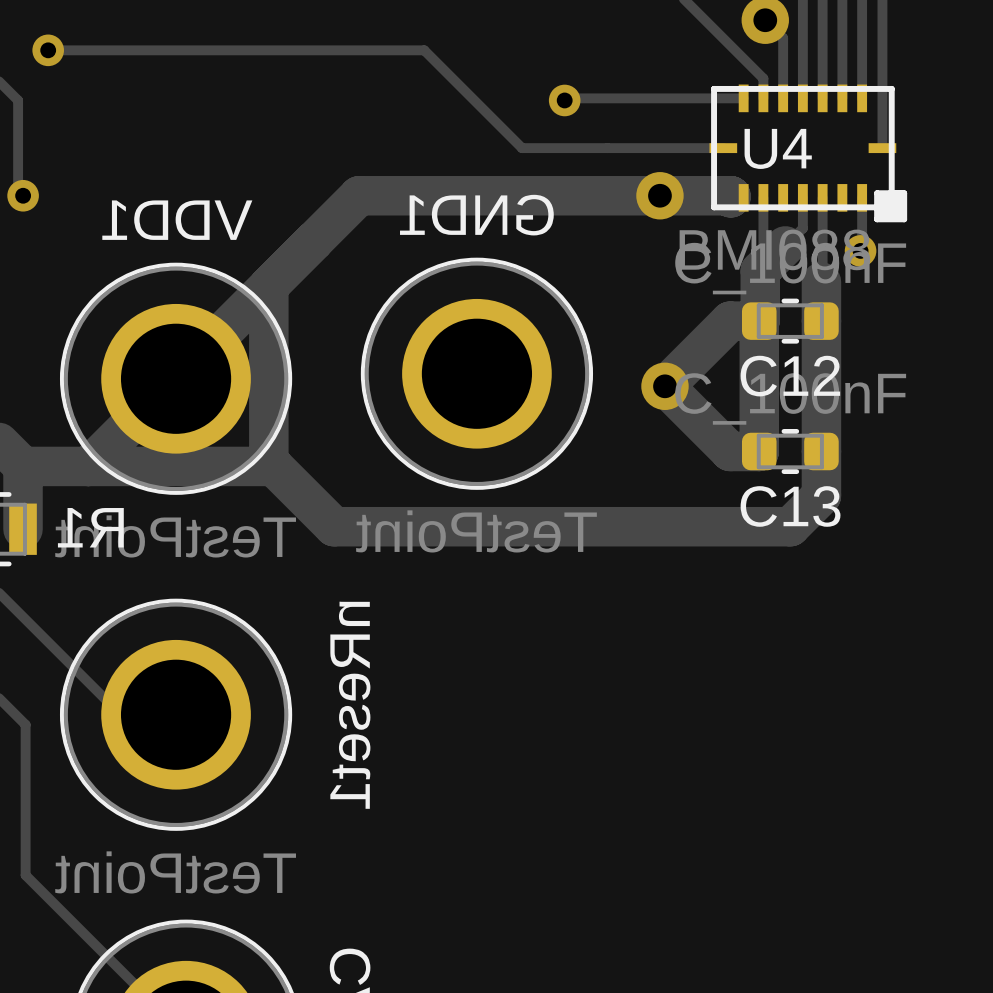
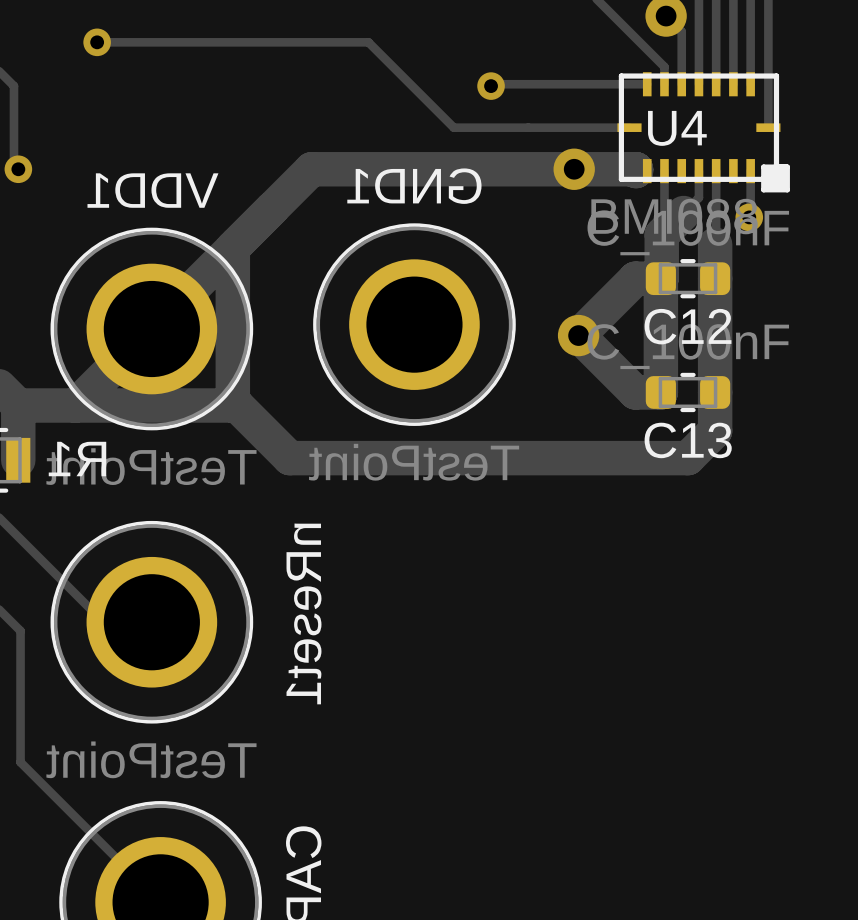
track: (48, 50) (113, 50) -> none
via position: (48, 50) -> (97, 42)

